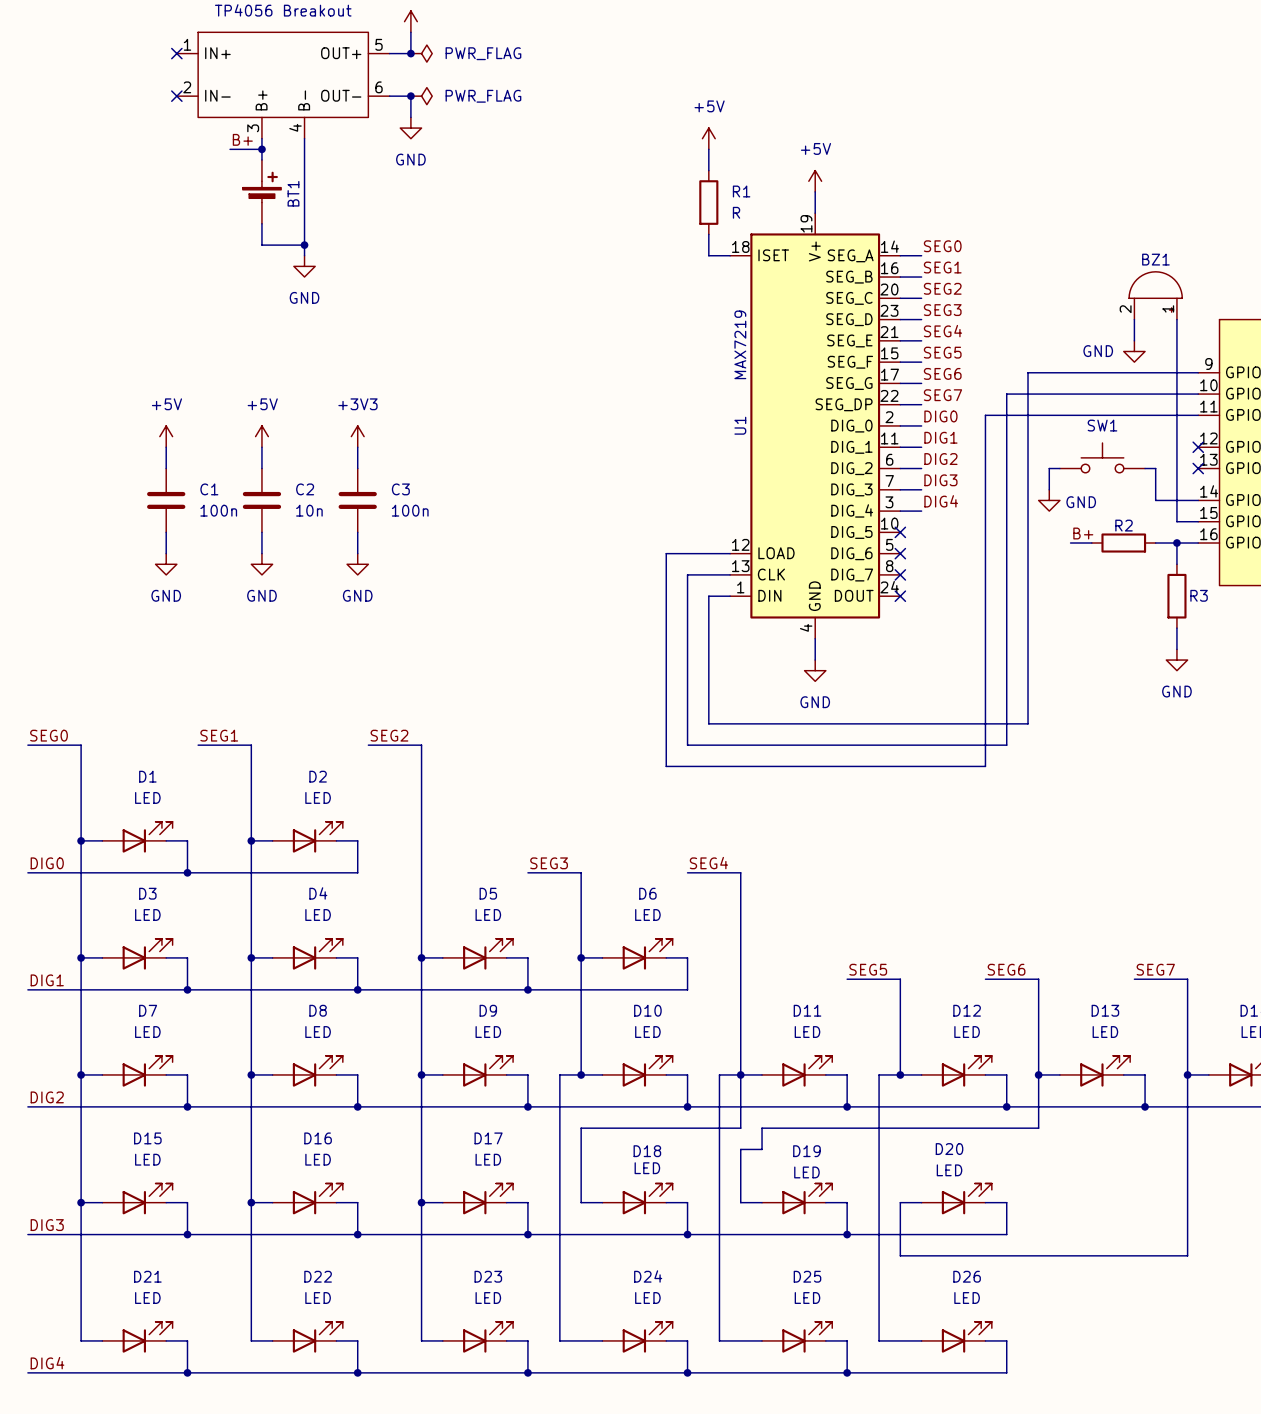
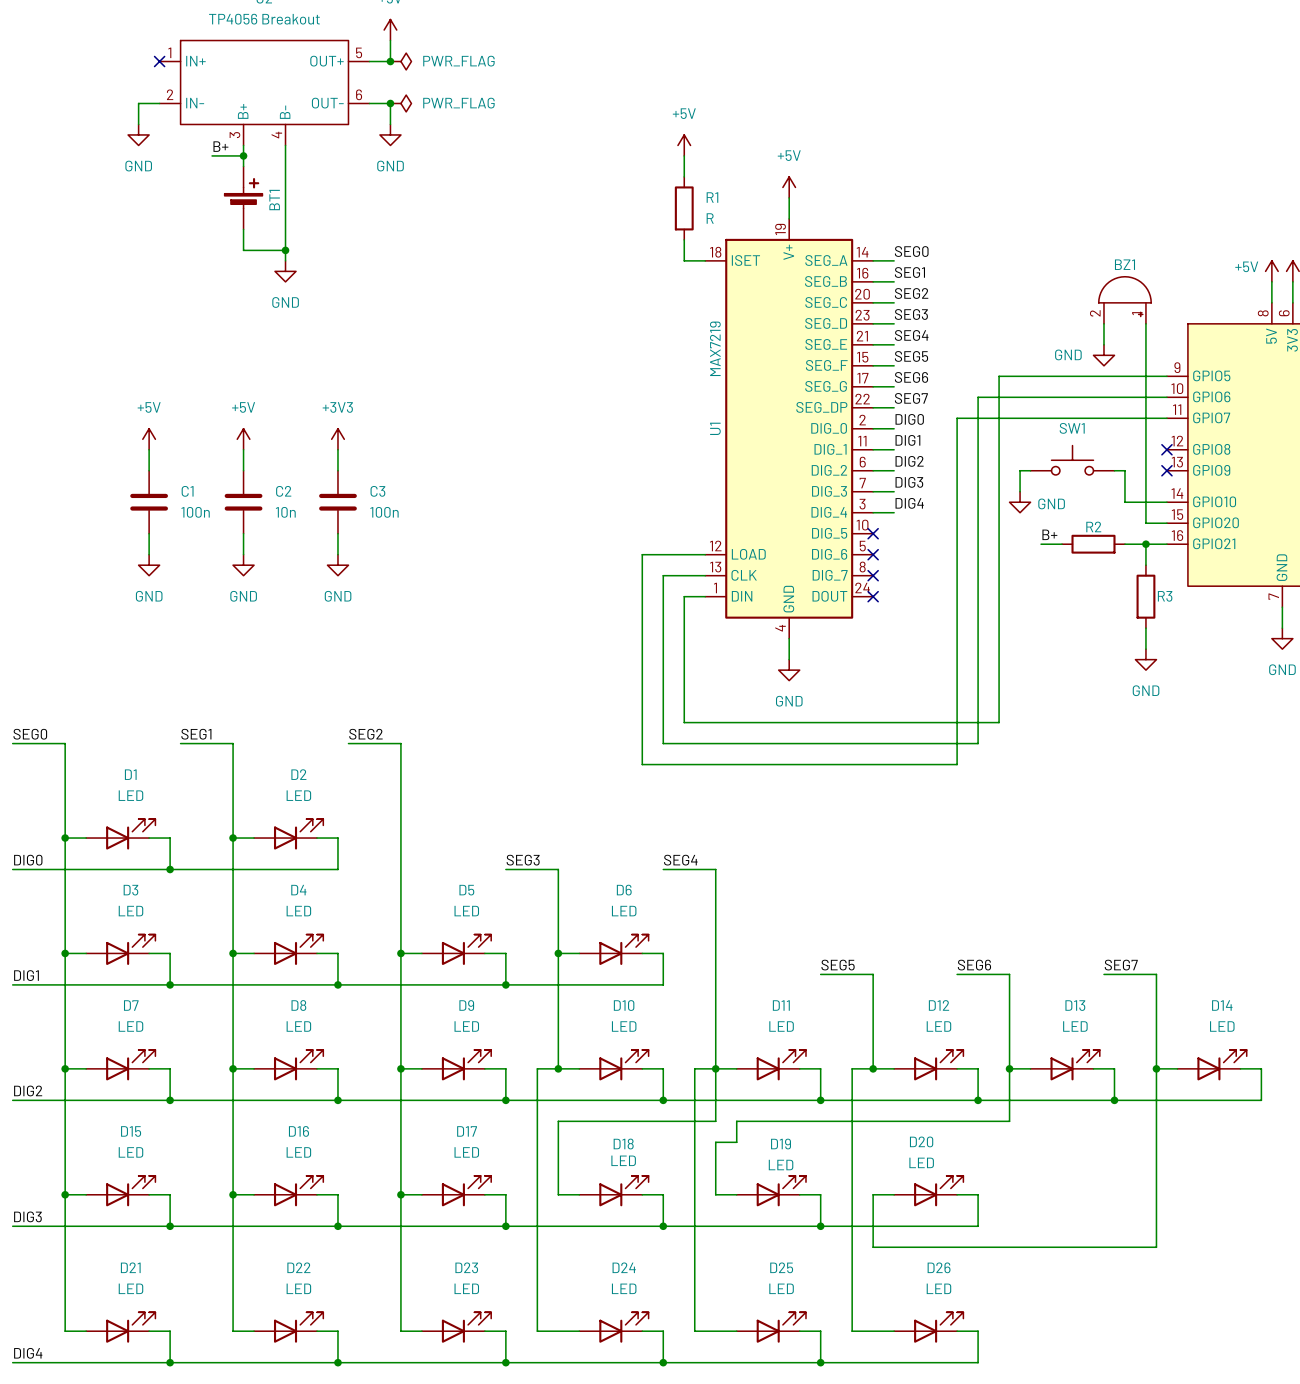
wire: none -> (159, 103) (138, 103) (138, 124)
no-connect mark: (176, 96) -> none
power symbol: none -> GND (138, 134)

